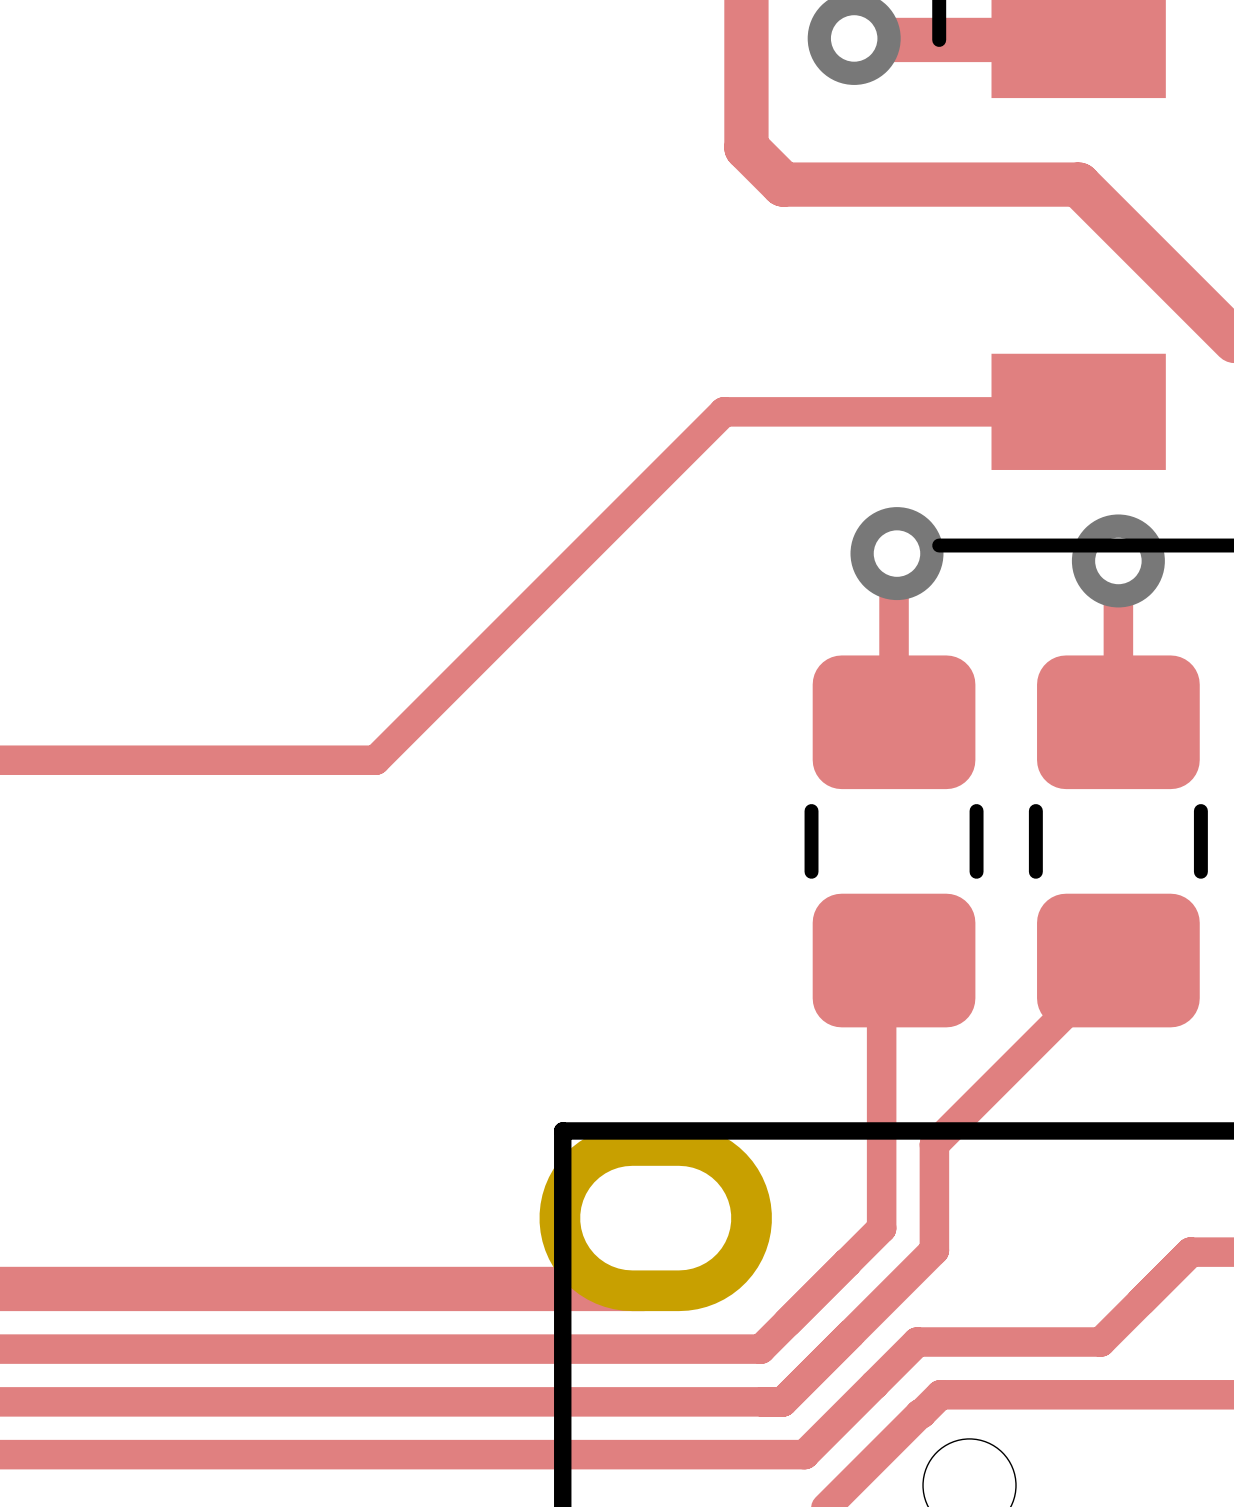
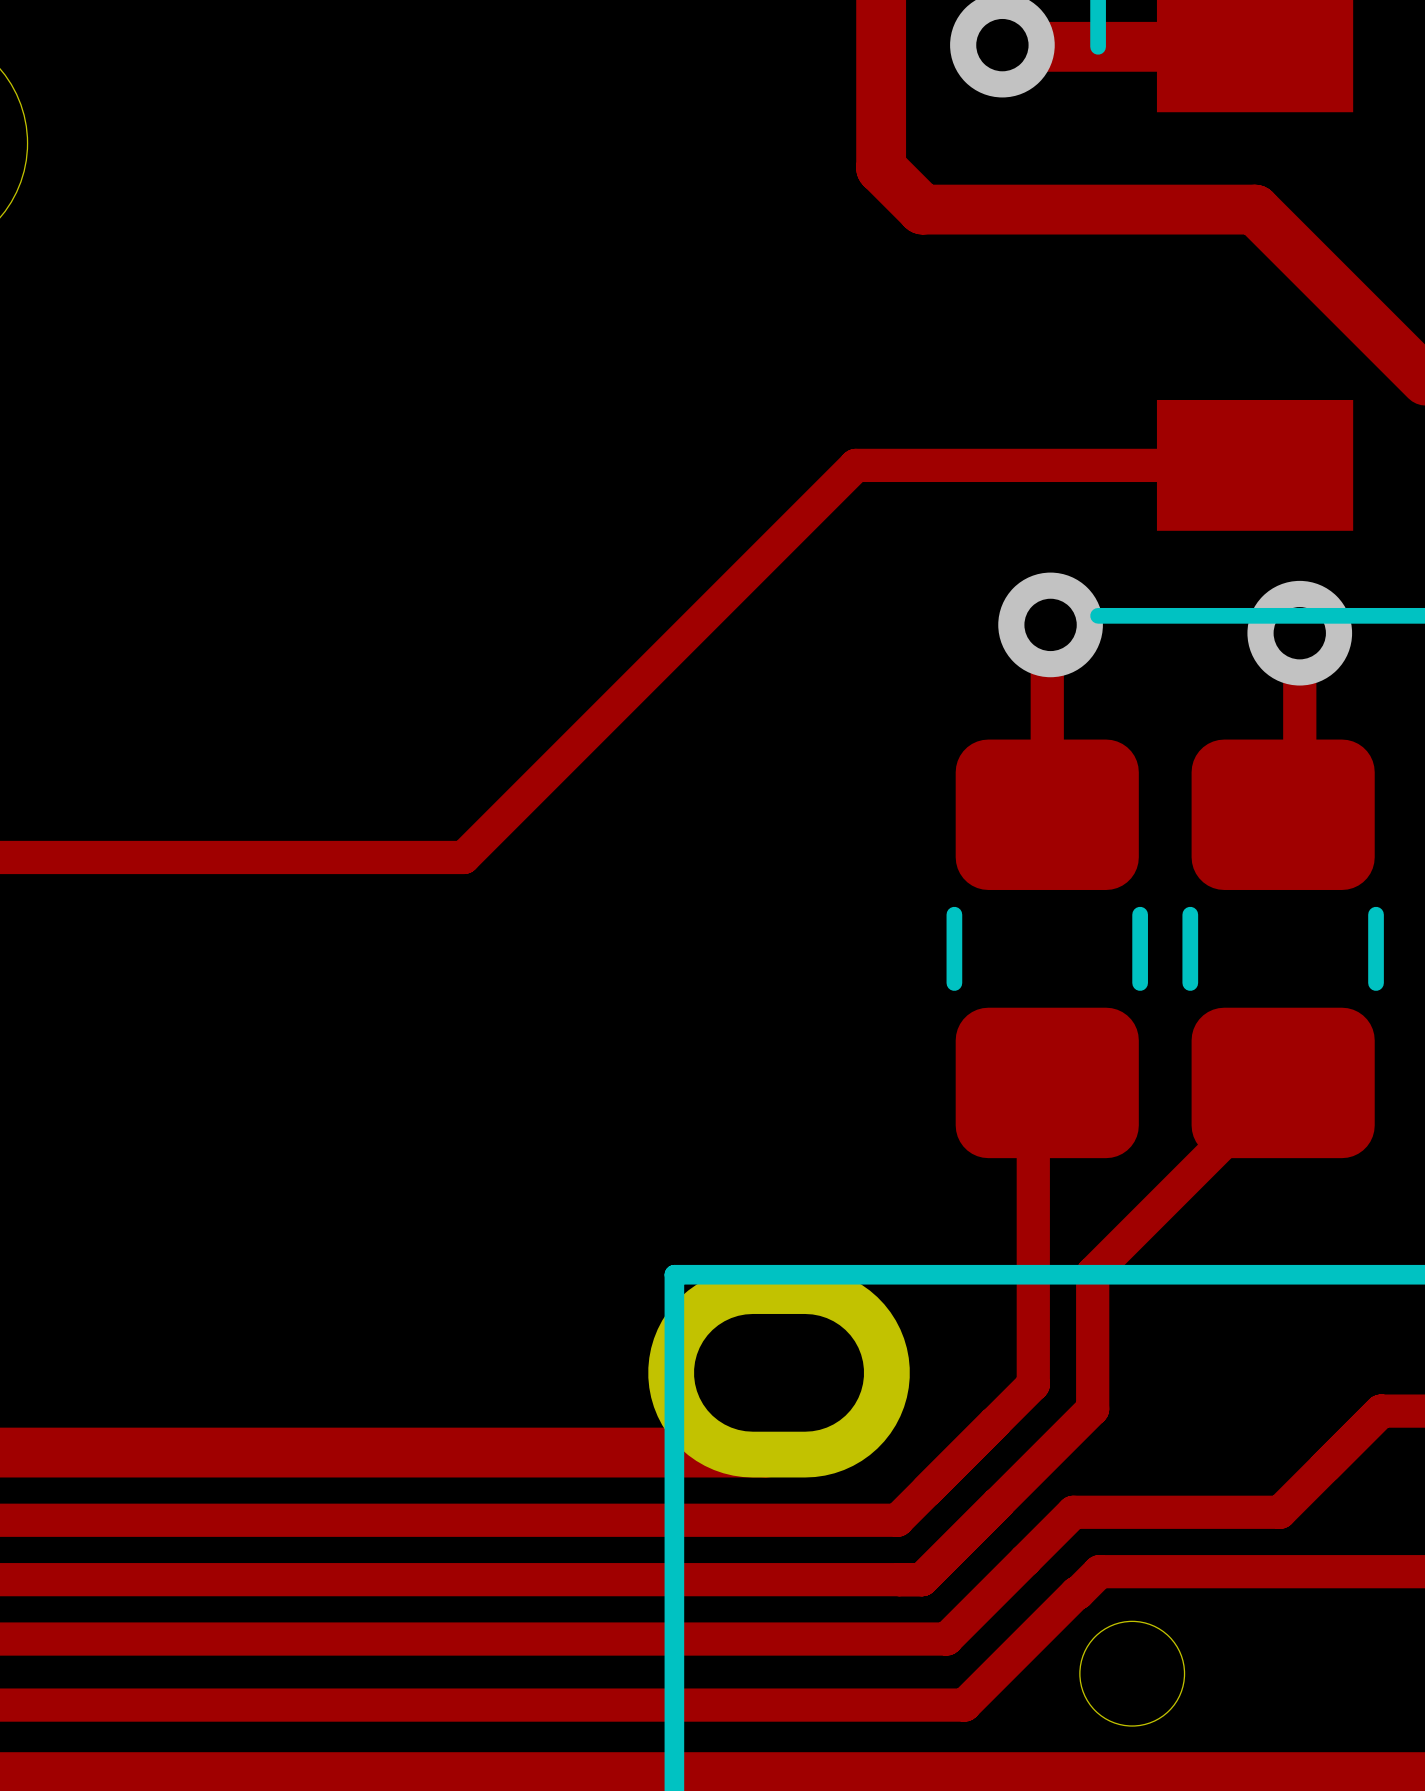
part position: (1118, 841) -> (1283, 948)
track: (1118, 960) (934, 1144) -> (1283, 1082) (1092, 1273) (1092, 1290)

